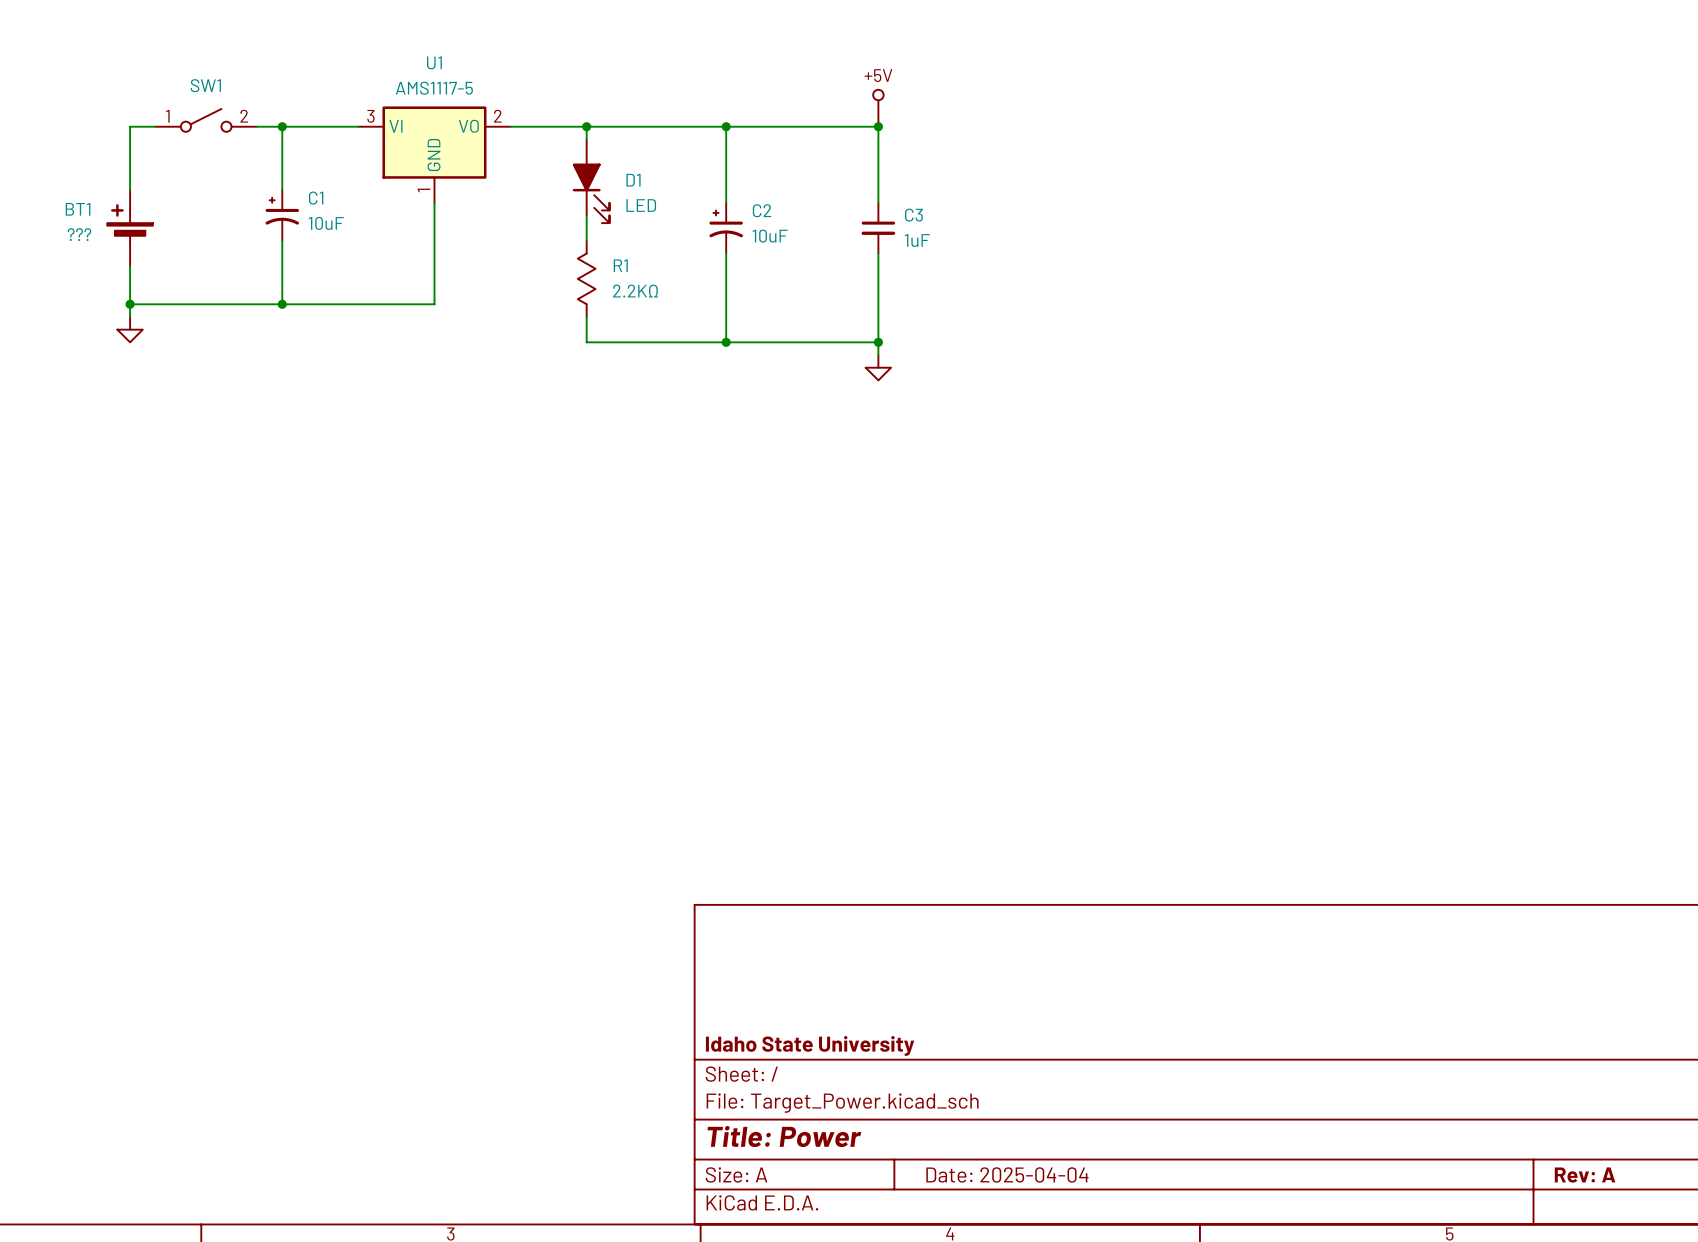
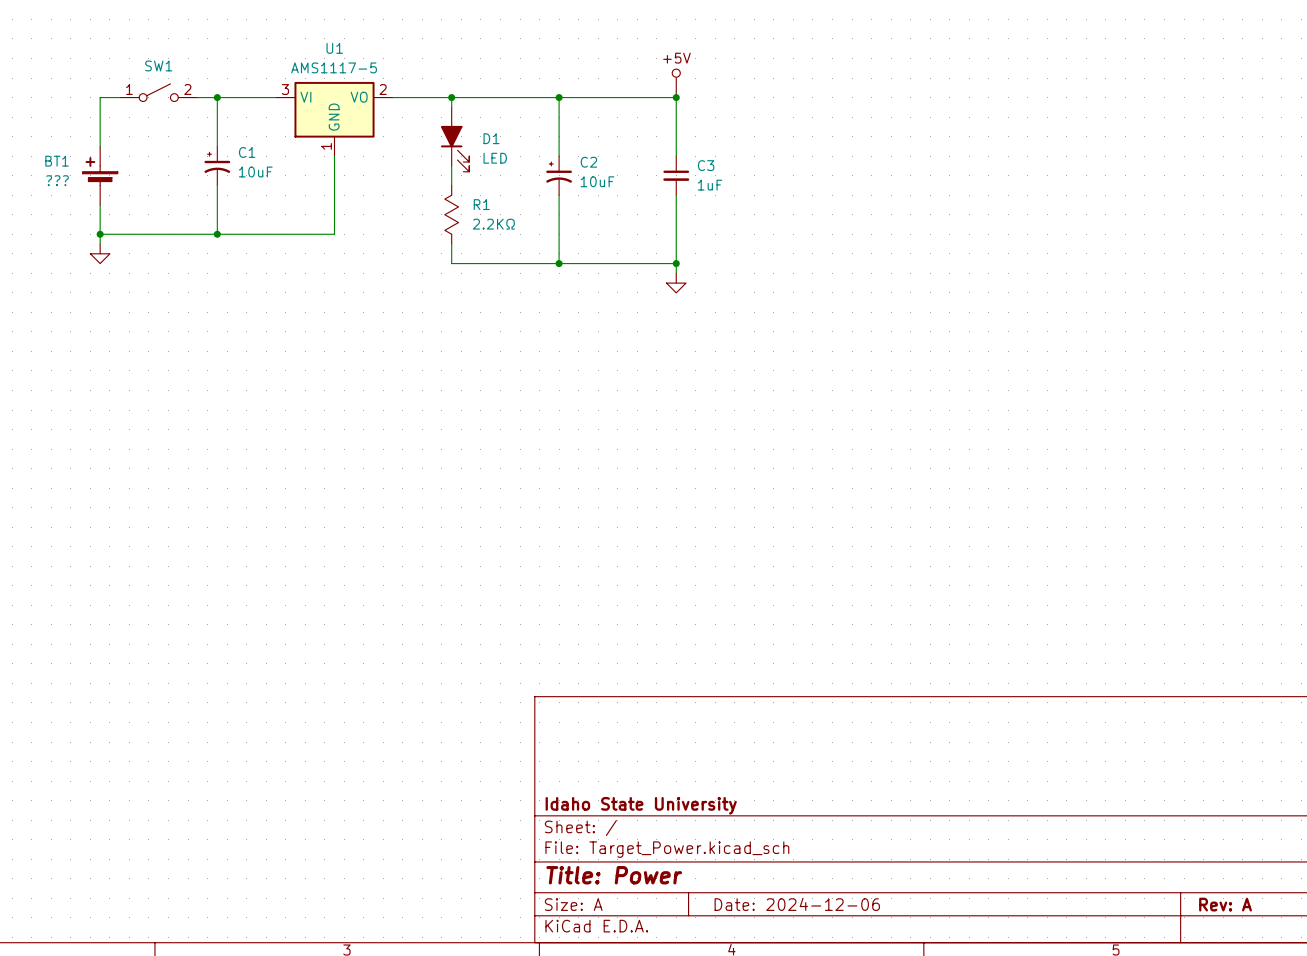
title block: Date: 2025-04-04 (1007, 1174) -> Date: 2024-12-06 (797, 904)

